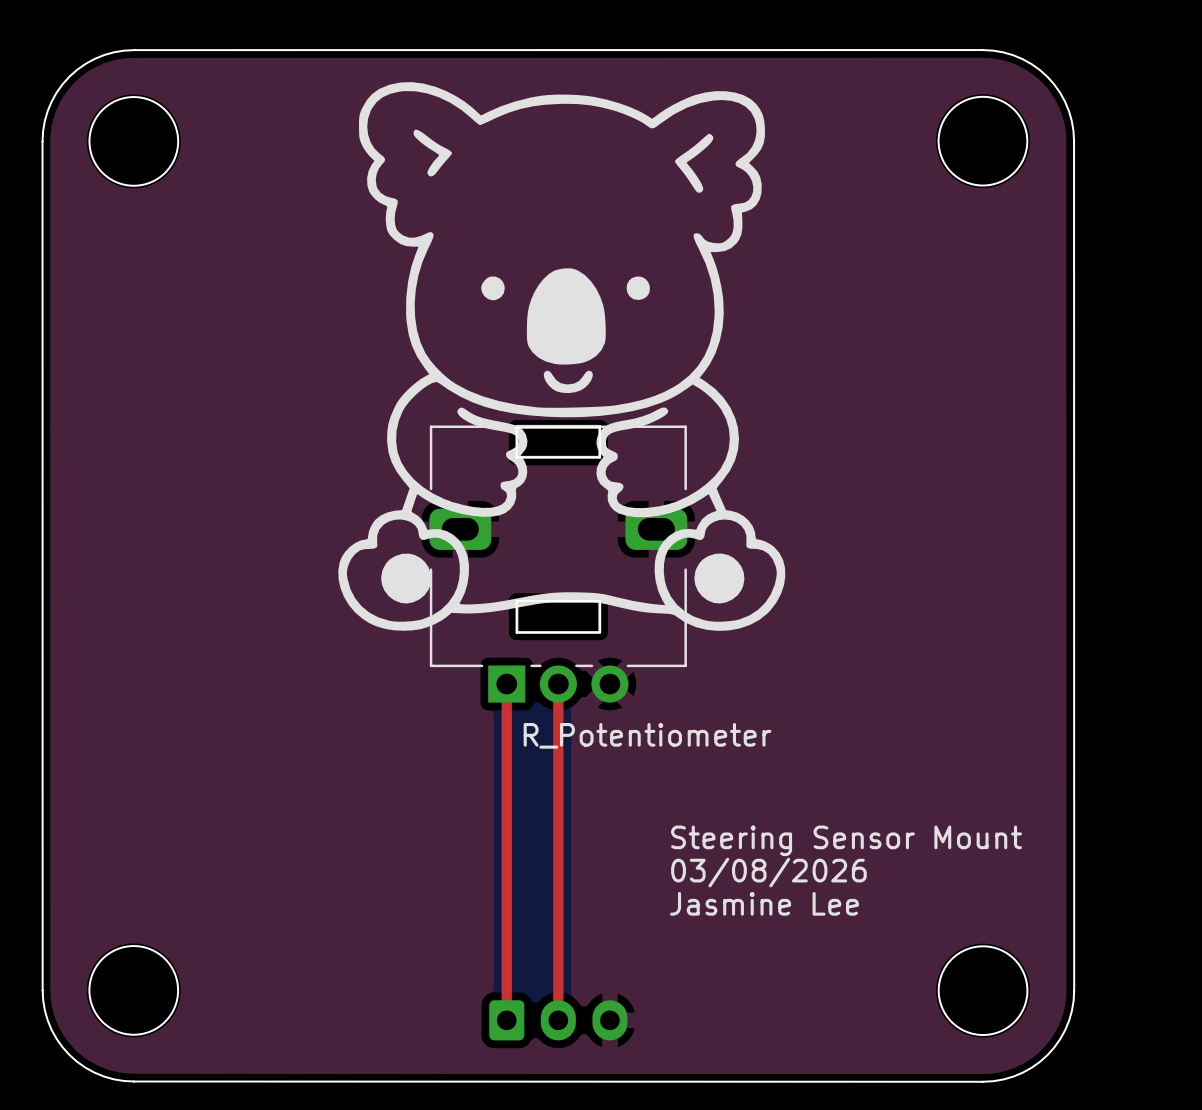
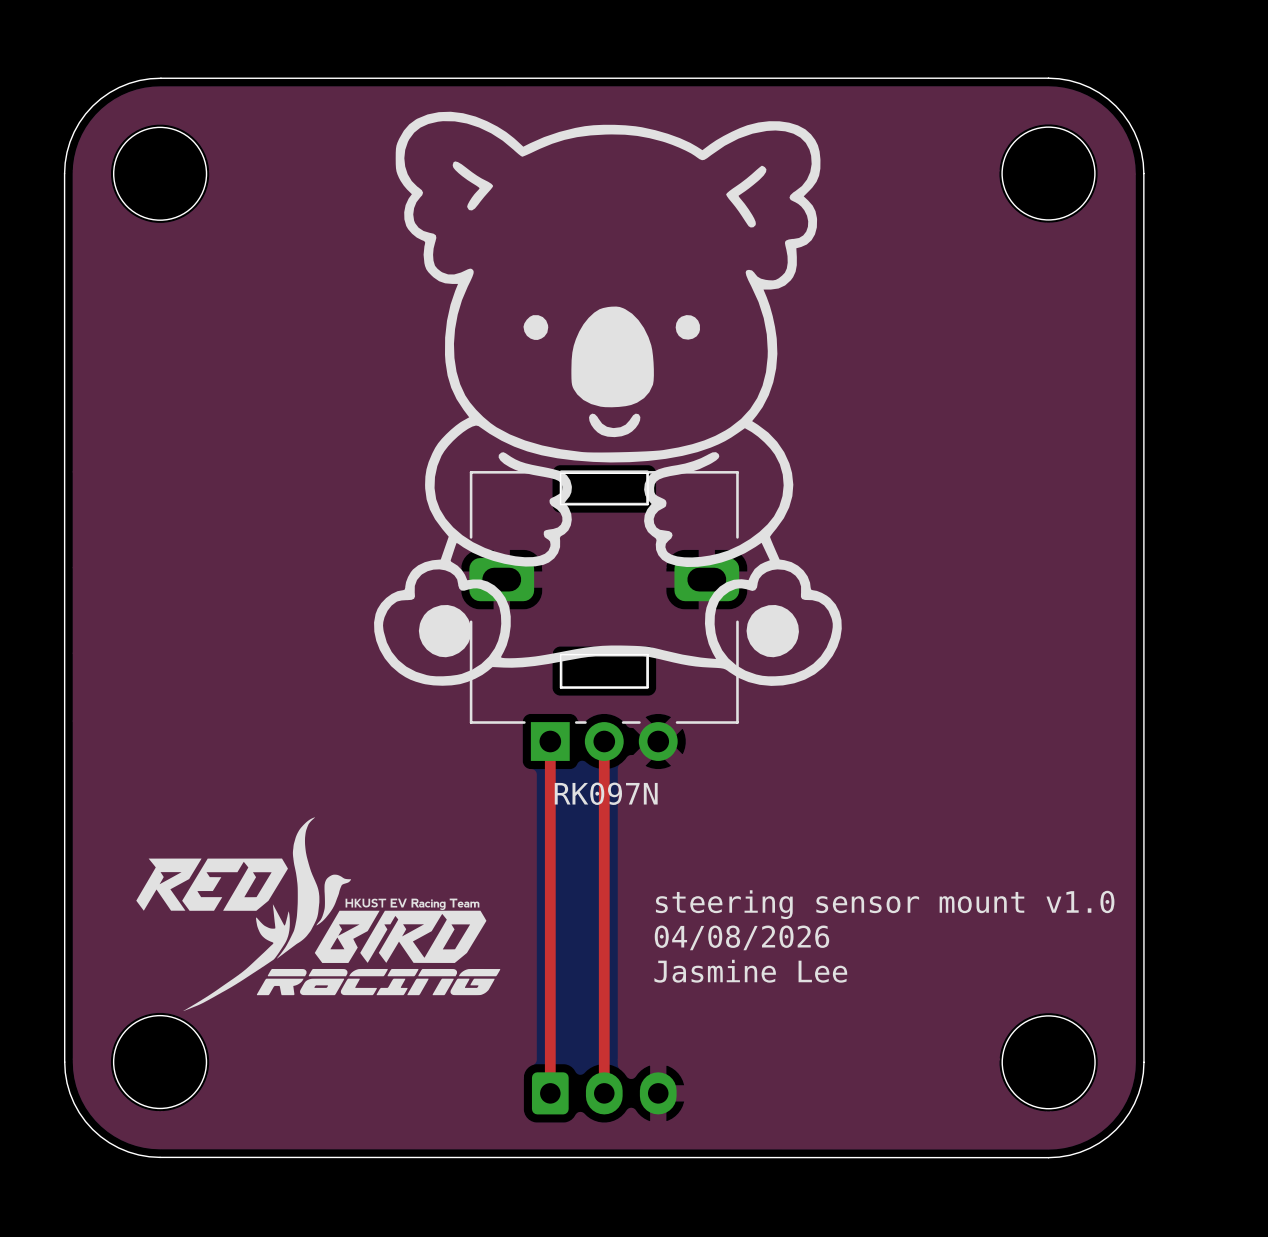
part value: R_Potentiometer (647, 735) -> RK097N (606, 793)
drawing: none -> [136, 817, 501, 1012]
text: Steering Sensor Mount (846, 840) -> steering sensor mount v1.0 (885, 904)
text: 03/08/2026 (768, 872) -> 04/08/2026 (741, 937)
text position: Jasmine Lee (764, 903) -> Jasmine Lee (750, 971)

